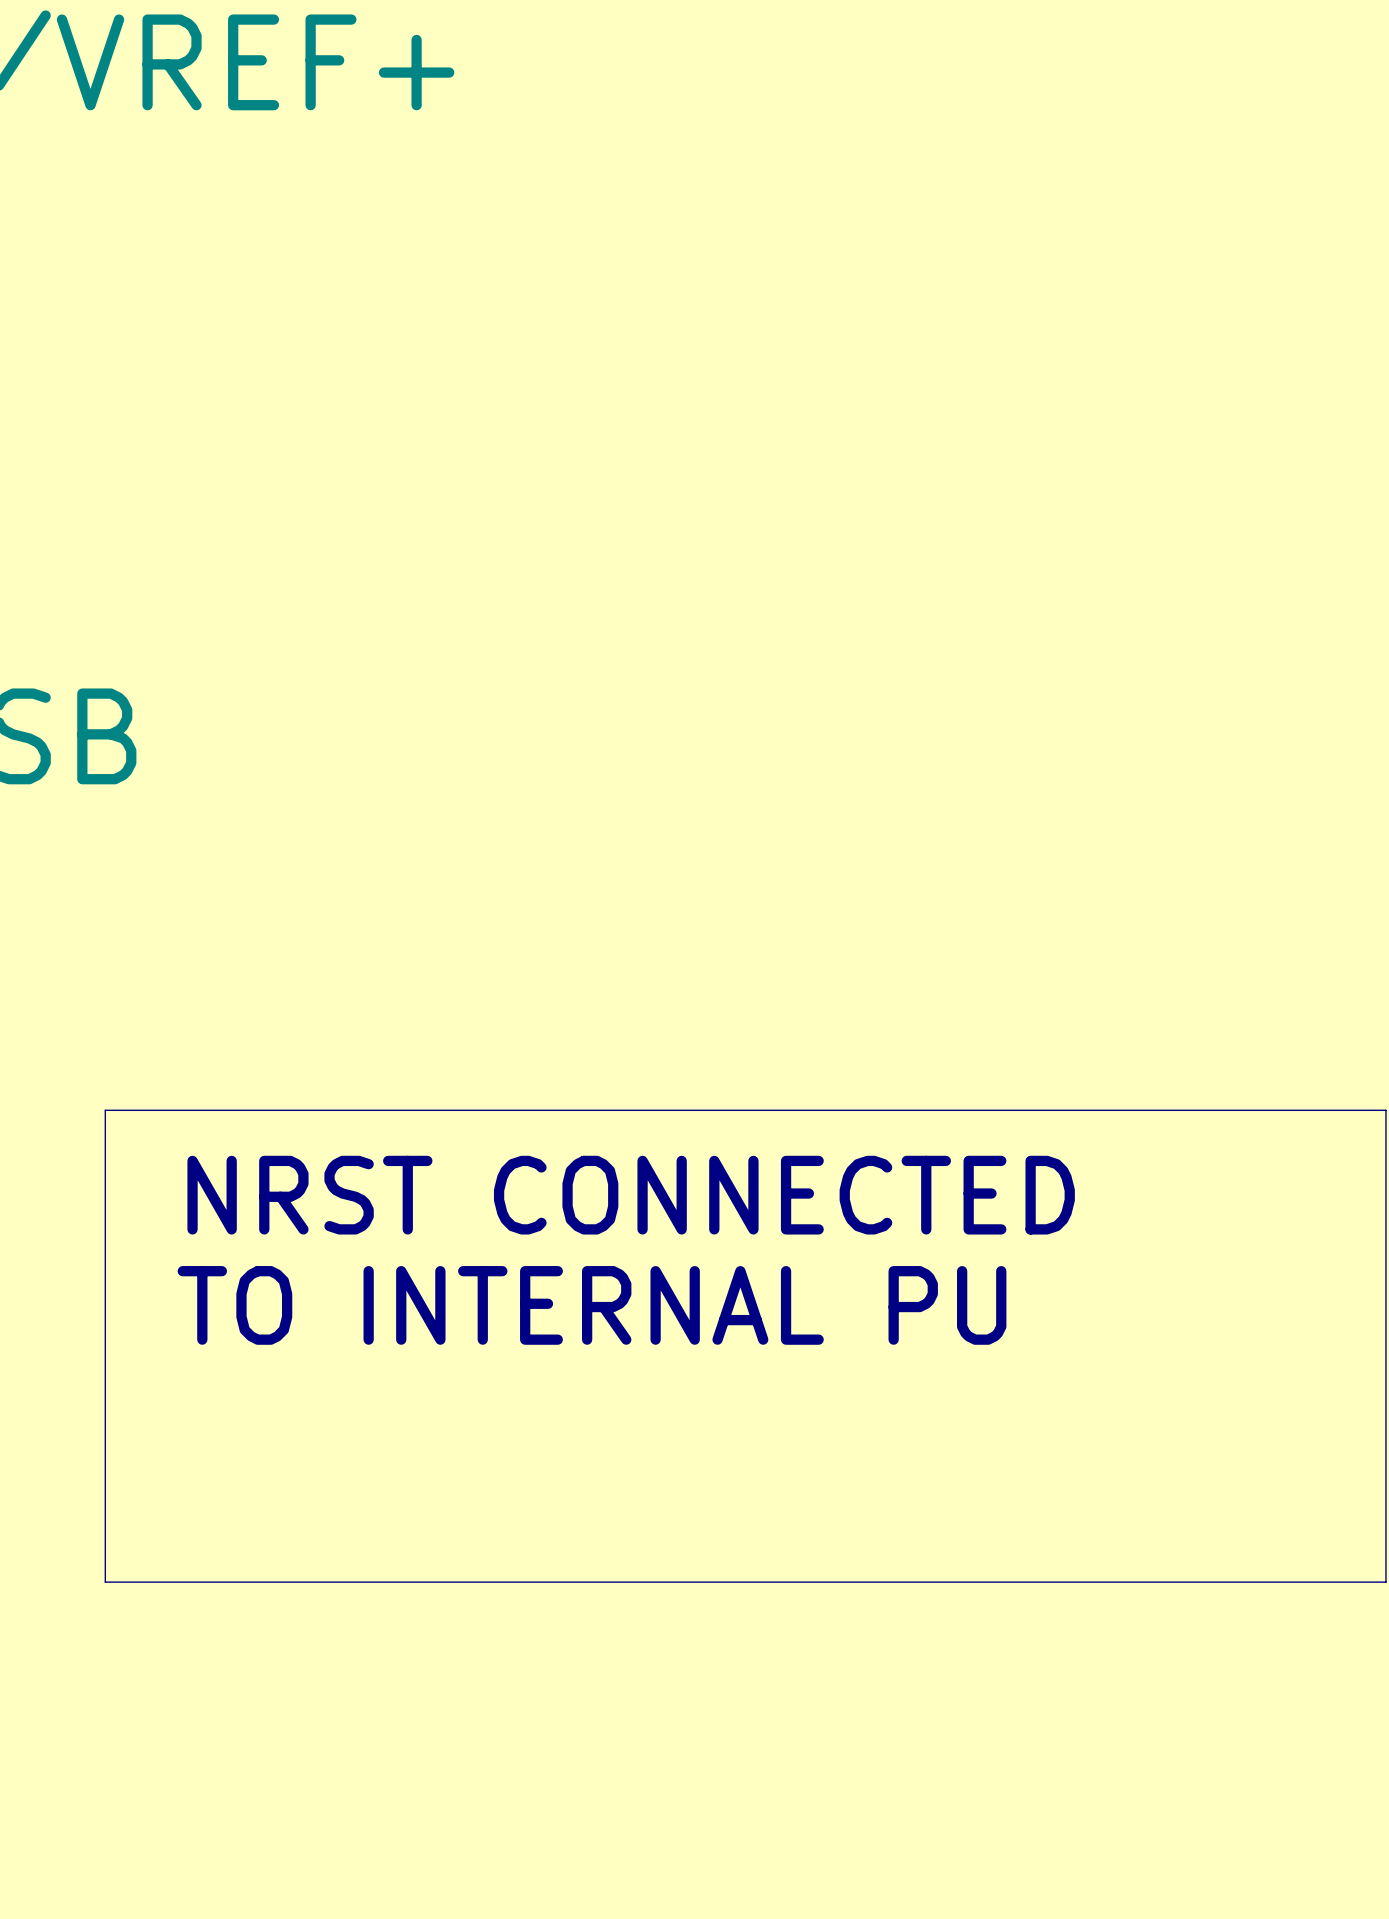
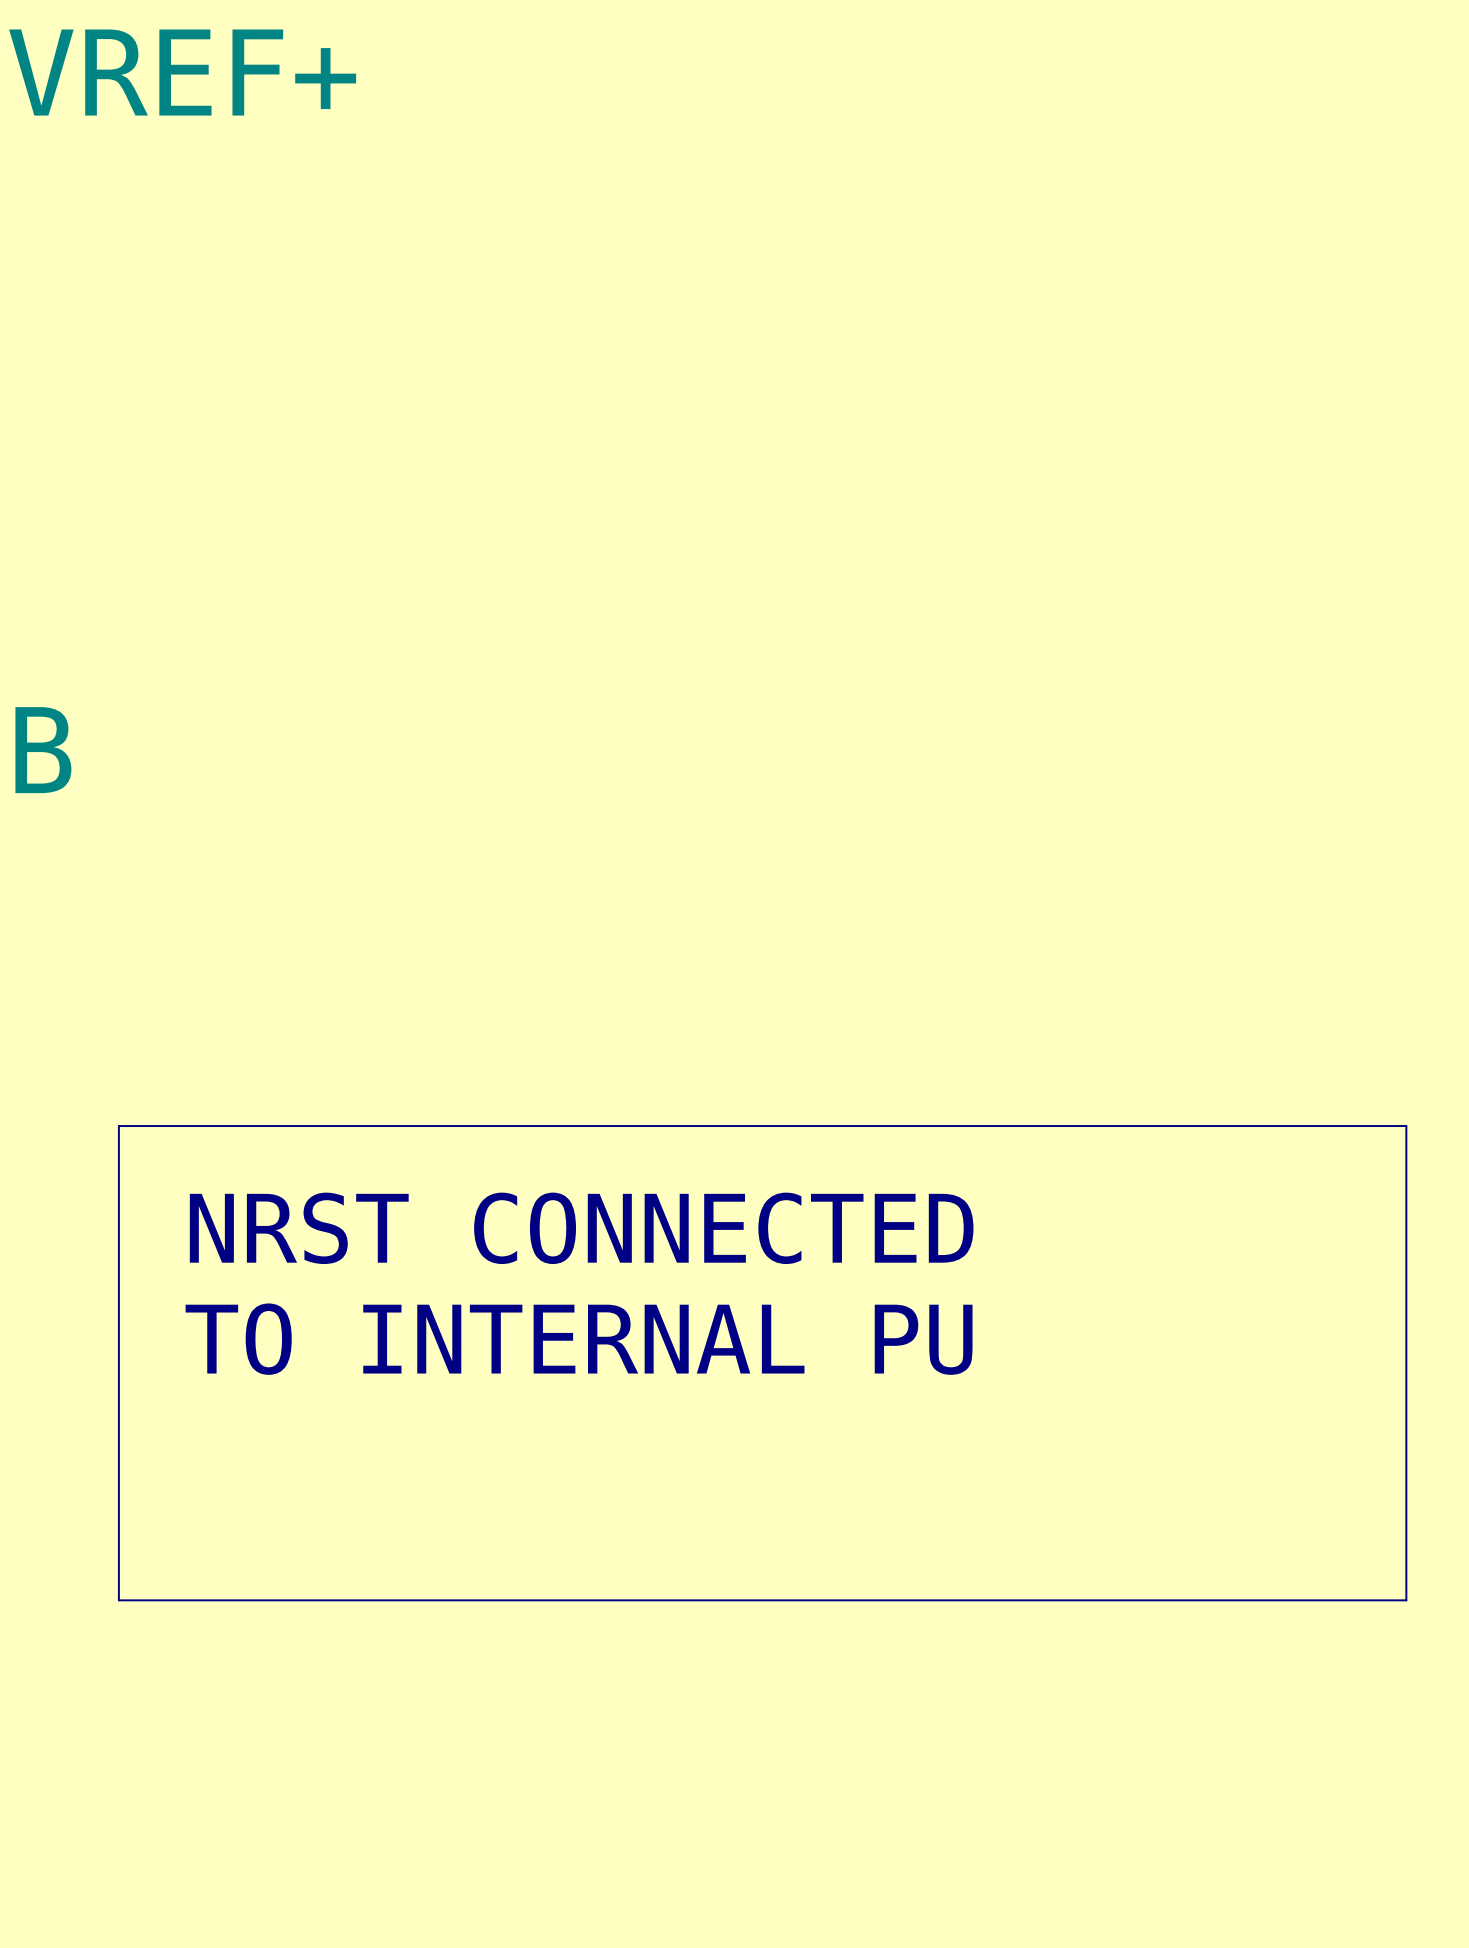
text position: NRST CONNECTED (631, 1195) -> NRST CONNECTED (581, 1228)
text position: TO INTERNAL PU (592, 1305) -> TO INTERNAL PU (579, 1339)

